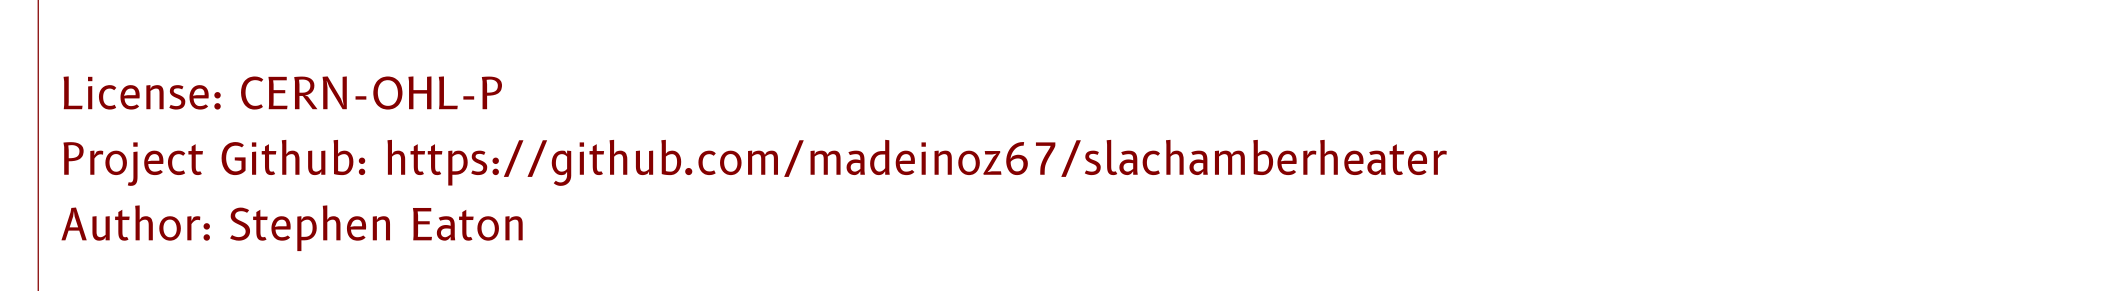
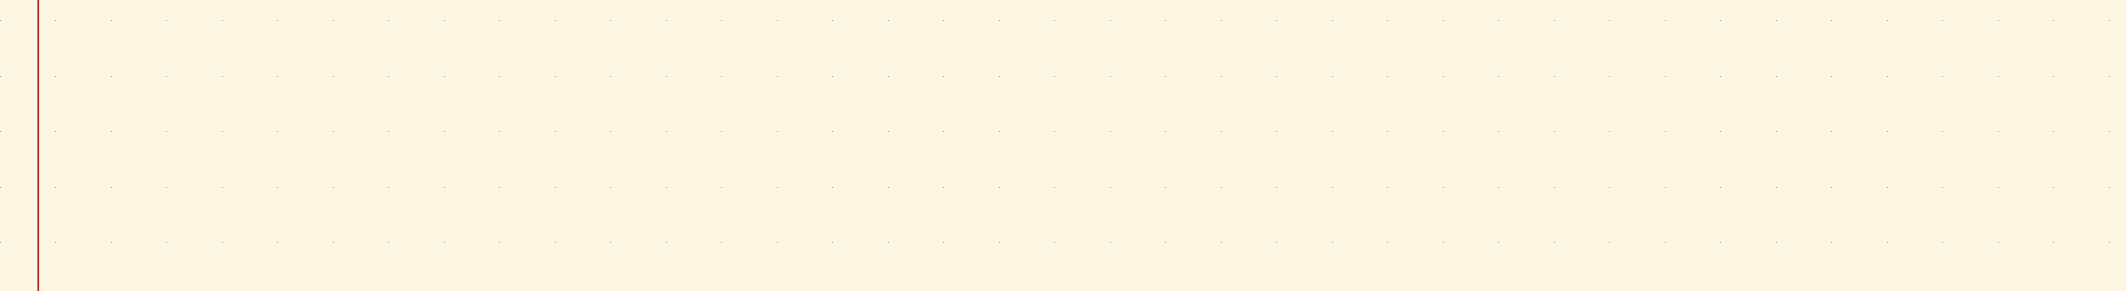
title block: License: CERN-OHL-P (282, 92) -> none
title block: Project Github: https://github.com/madeinoz67/slachamberheater (755, 162) -> none
title block: Author: Stephen Eaton (292, 228) -> none

